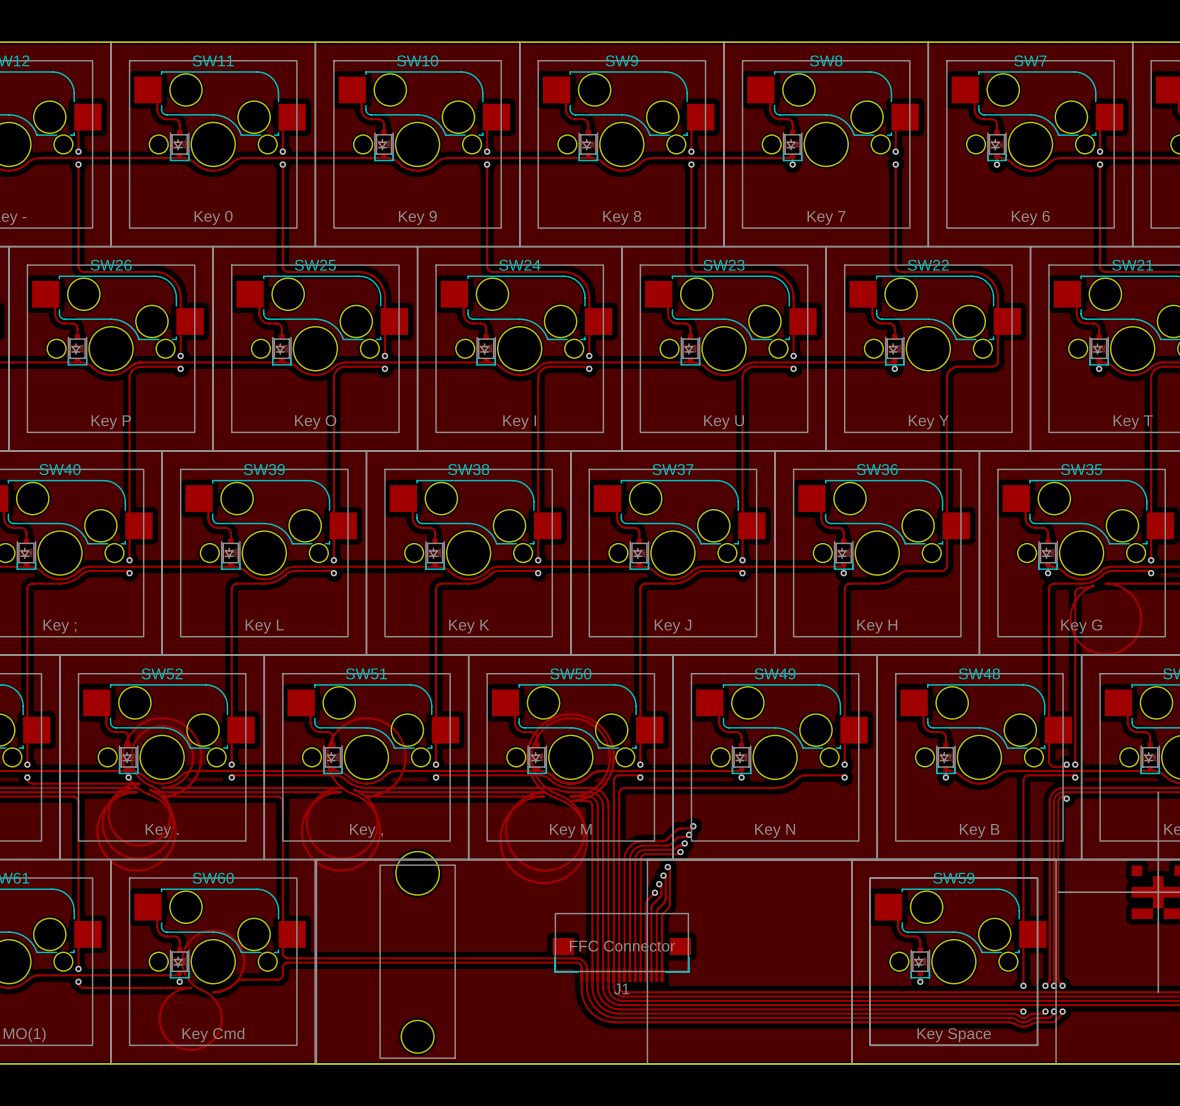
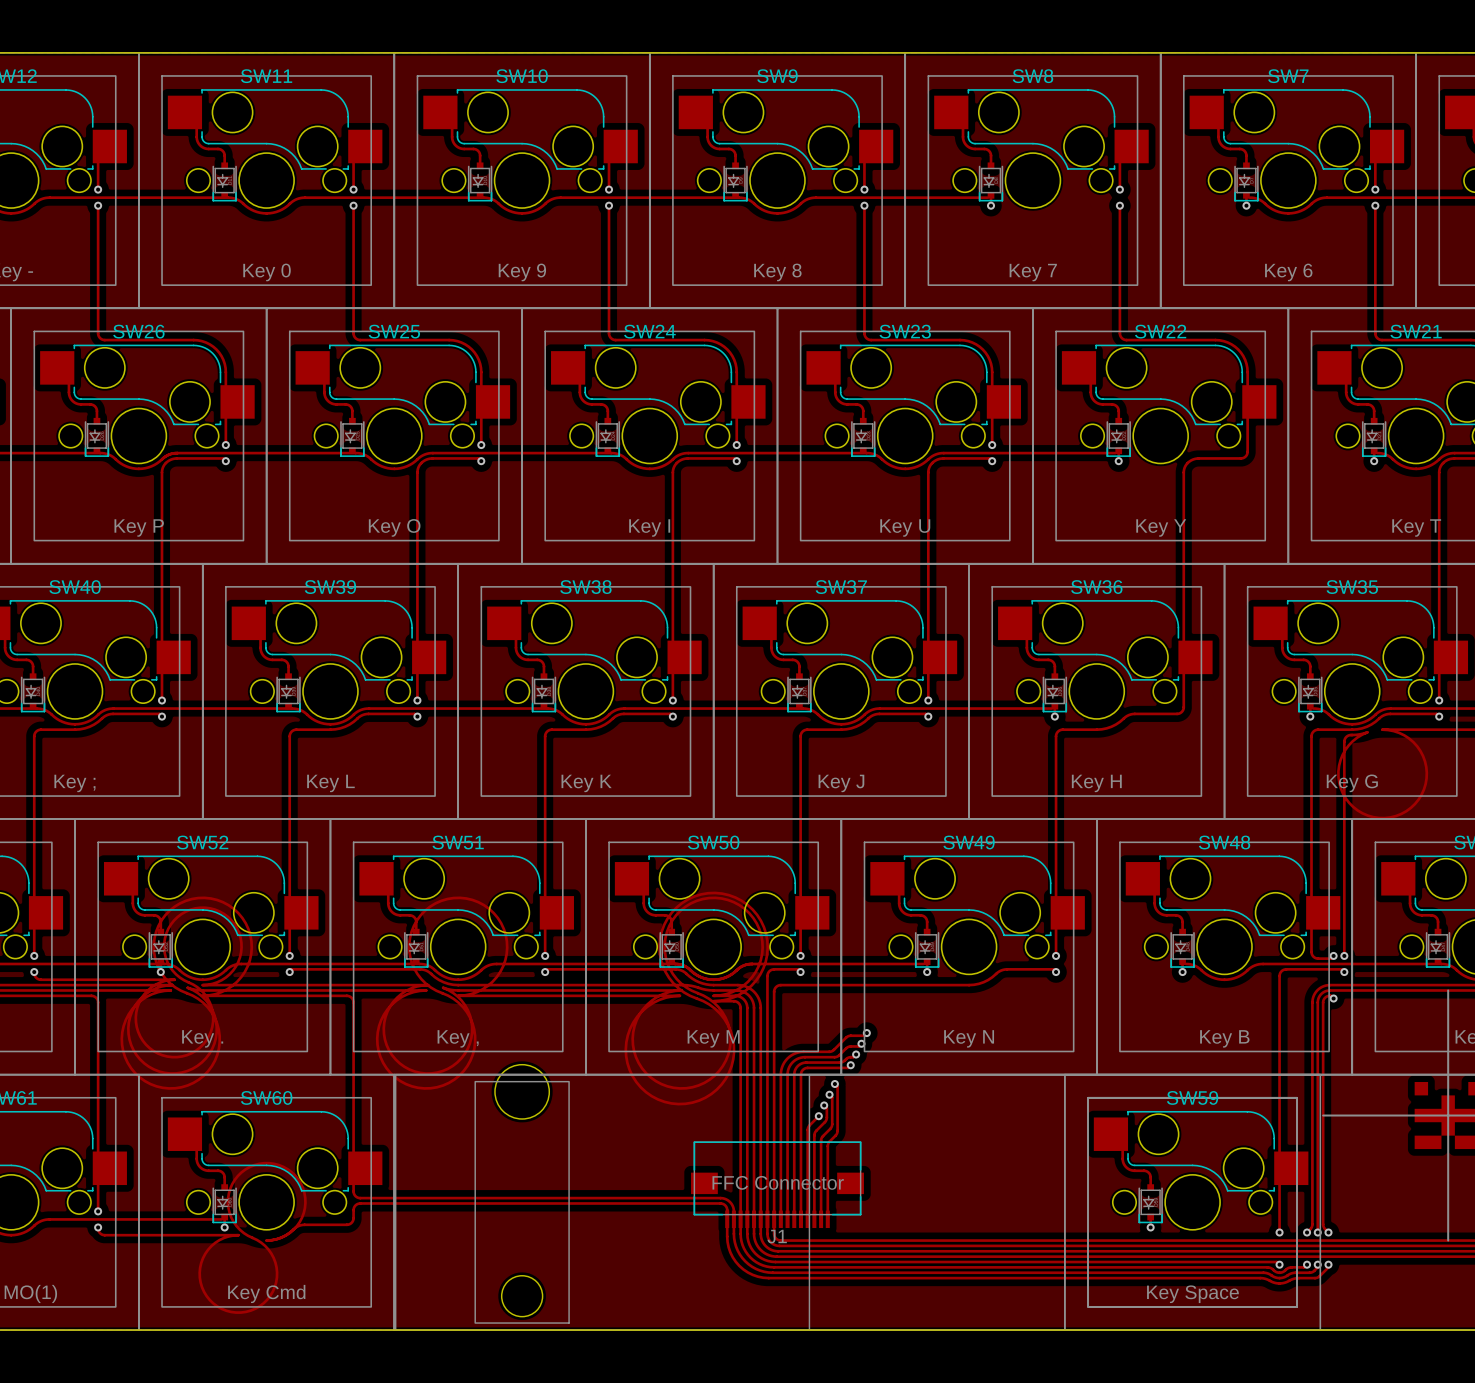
J1 footprint: [552, 913, 692, 983] -> [691, 1141, 864, 1229]

